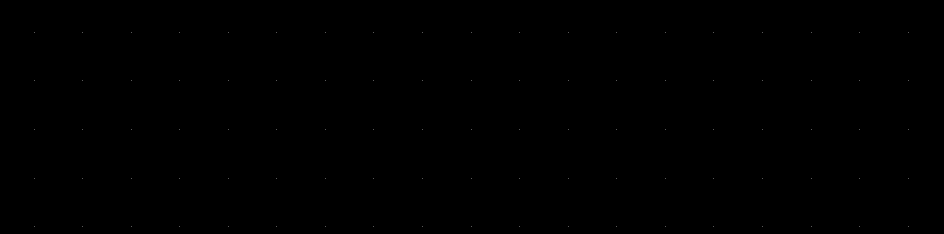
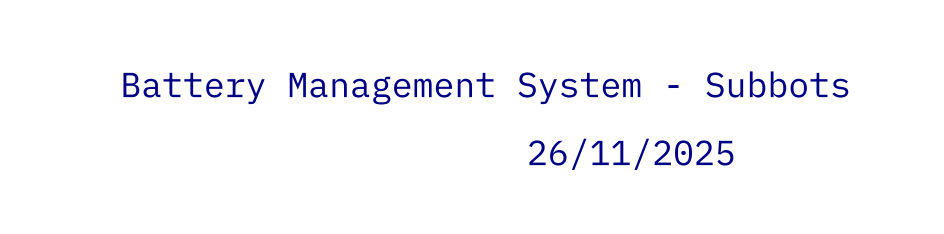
text: none -> Battery Management System - Subbots (485, 87)
text: none -> 26/11/2025 (631, 154)

